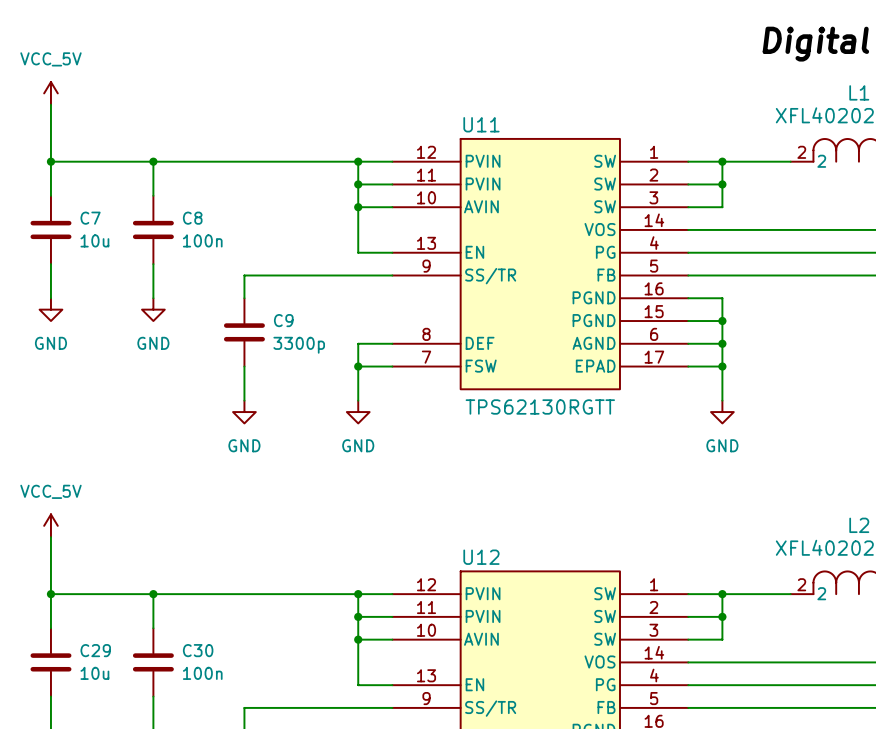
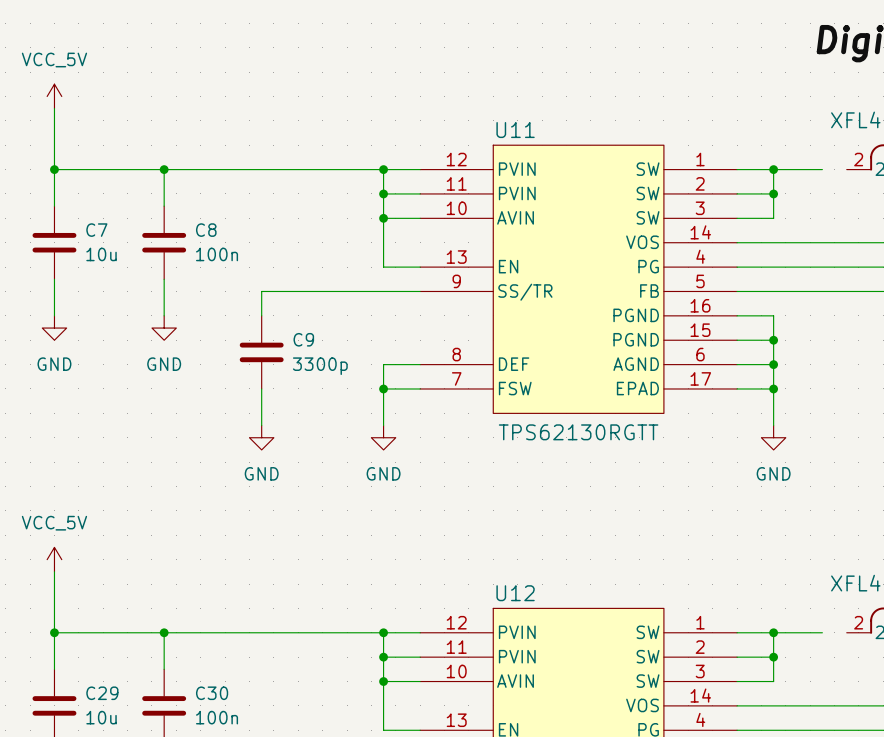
wire: (767, 161) (790, 161) -> none
wire: (767, 594) (790, 594) -> none

